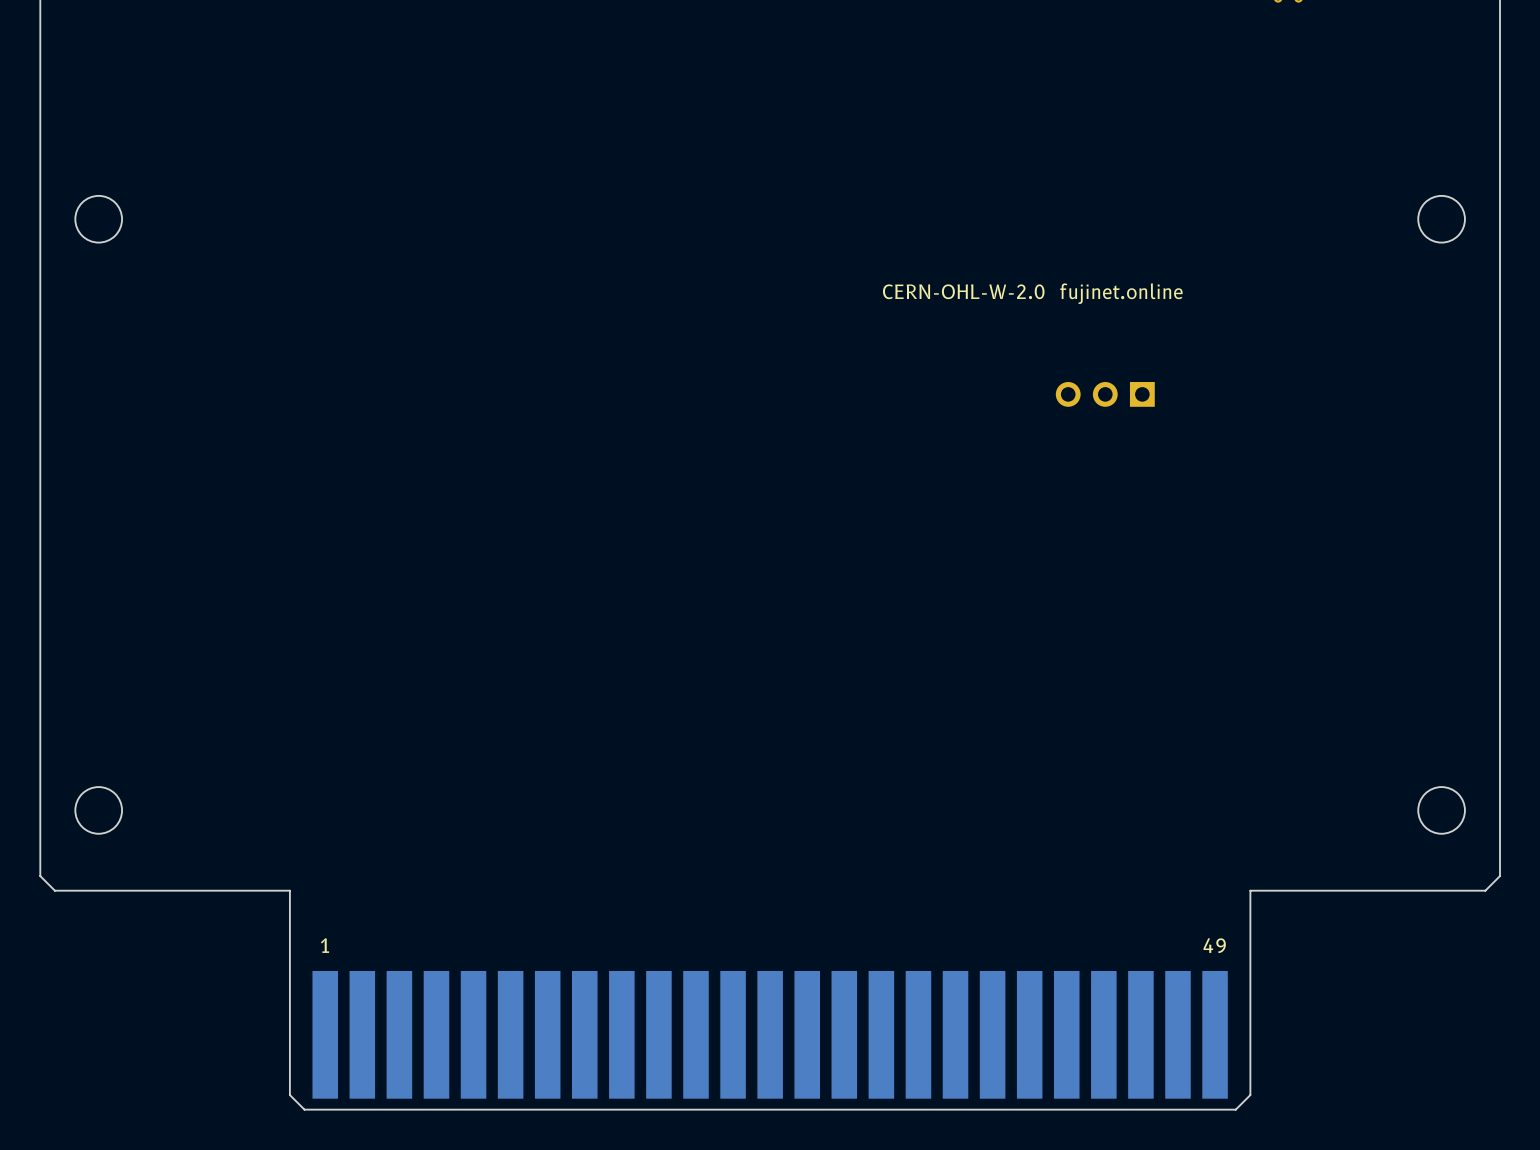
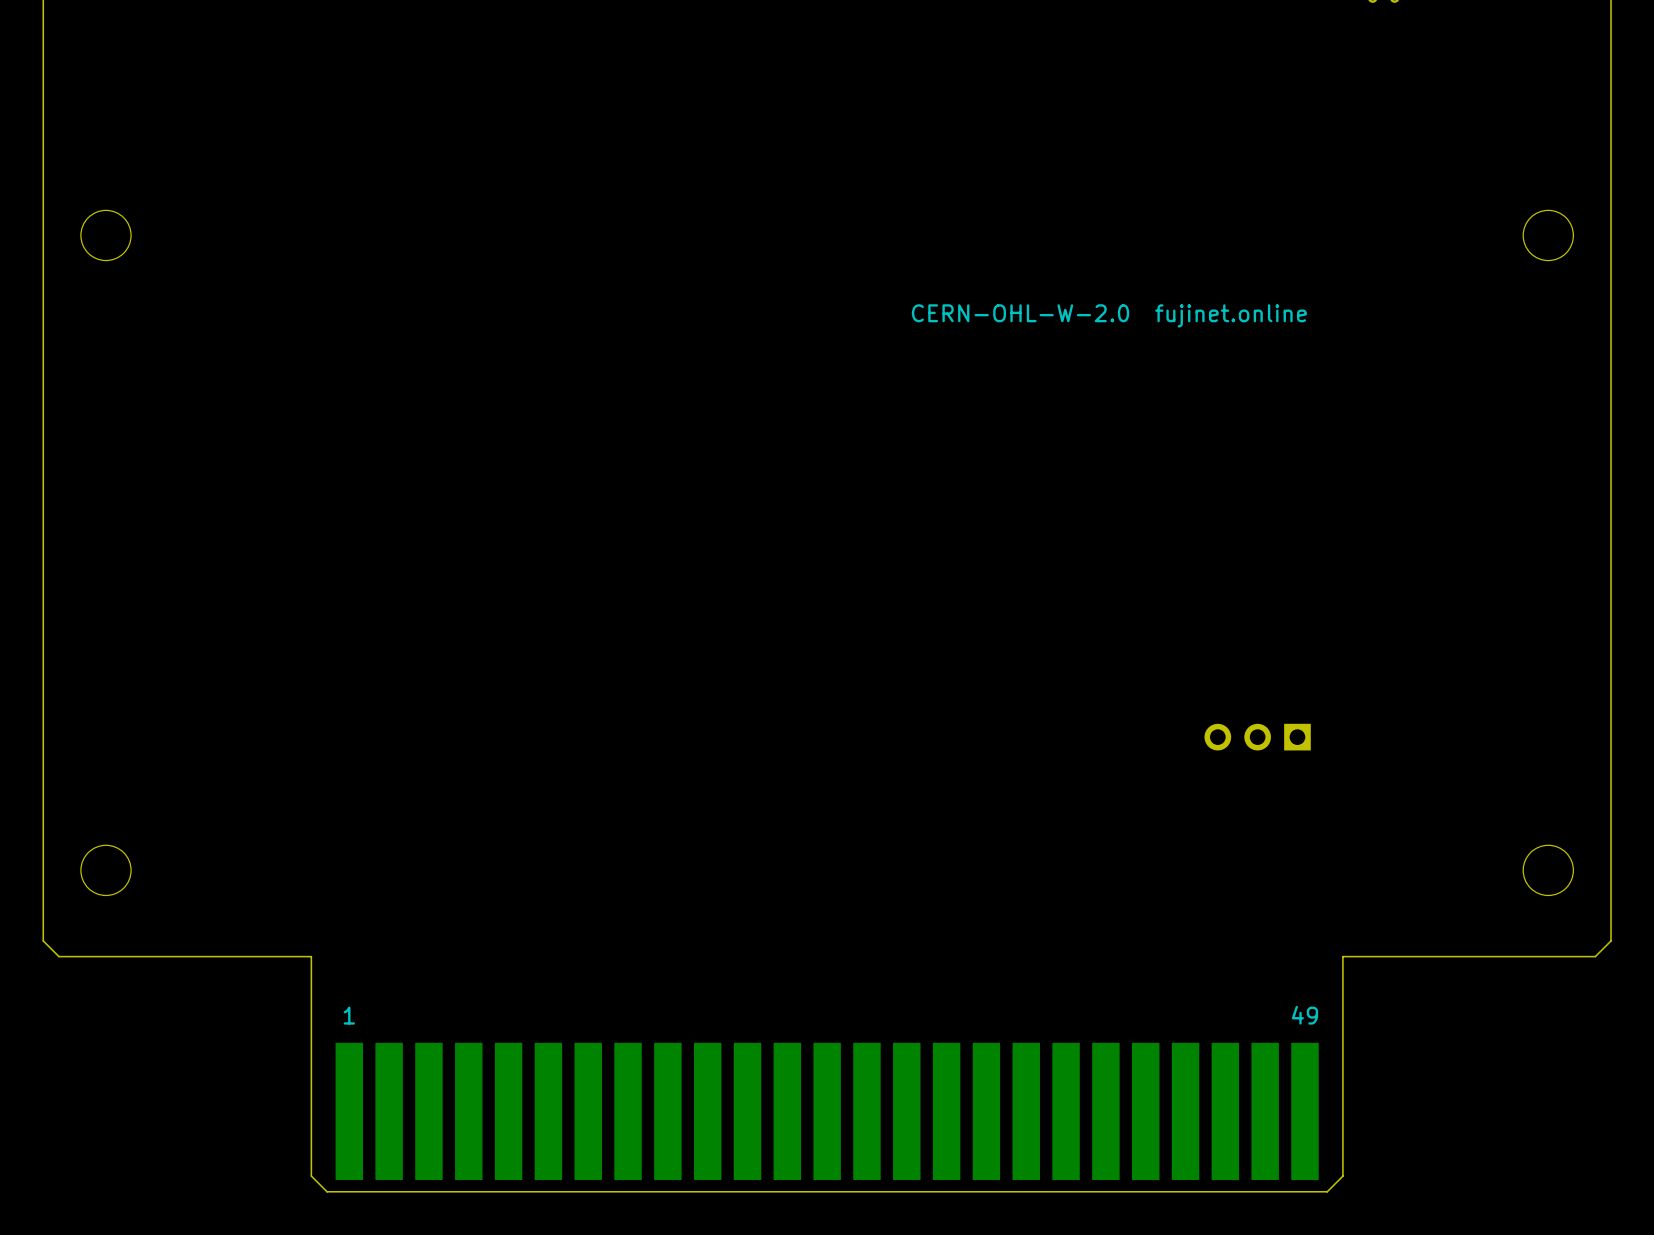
part position: (1105, 394) -> (1257, 737)

